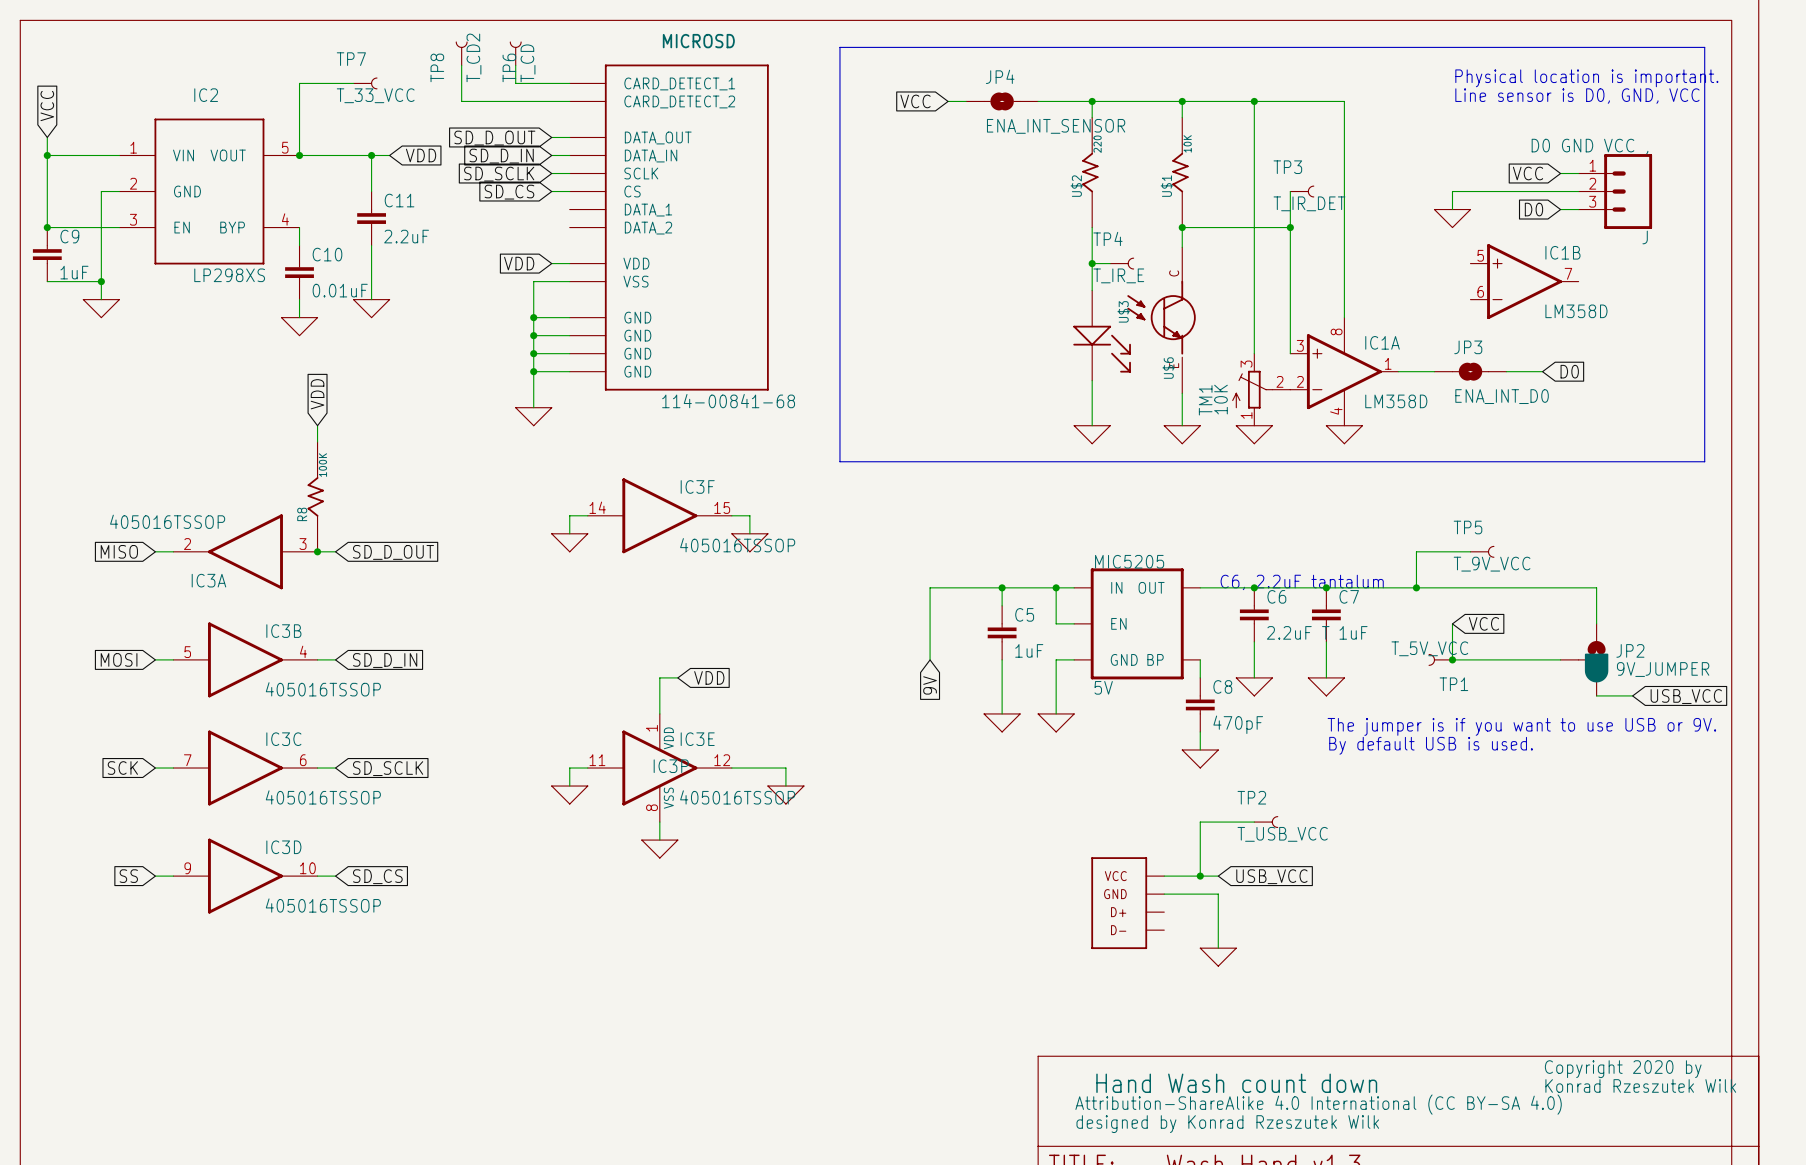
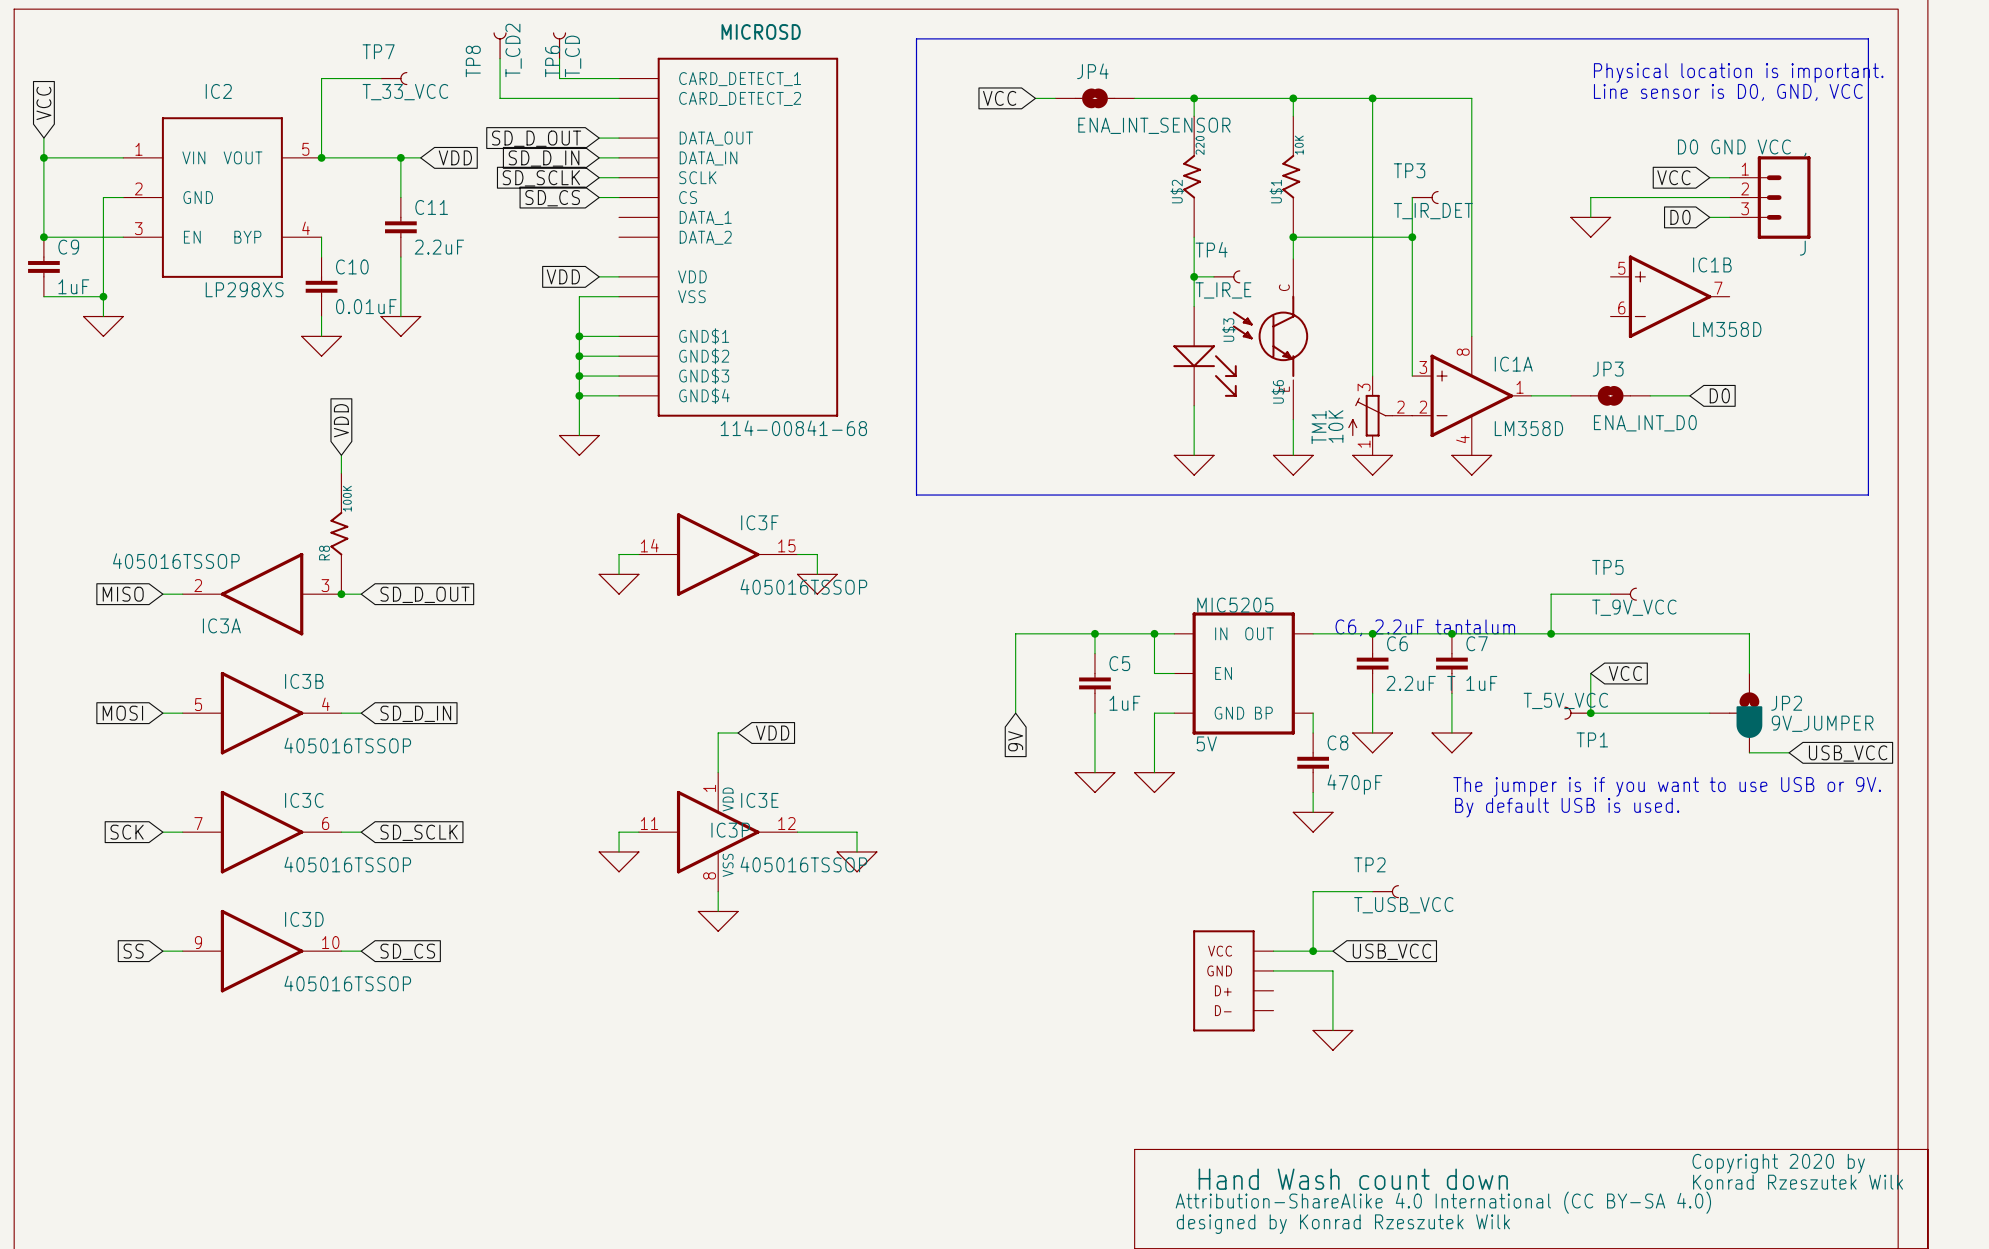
MICROSD pin name: GND (637, 317) -> GND$1 (704, 336)
MICROSD pin name: GND (637, 335) -> GND$2 (704, 356)
MICROSD pin name: GND (637, 353) -> GND$3 (704, 376)
MICROSD pin name: GND (637, 371) -> GND$4 (704, 395)

